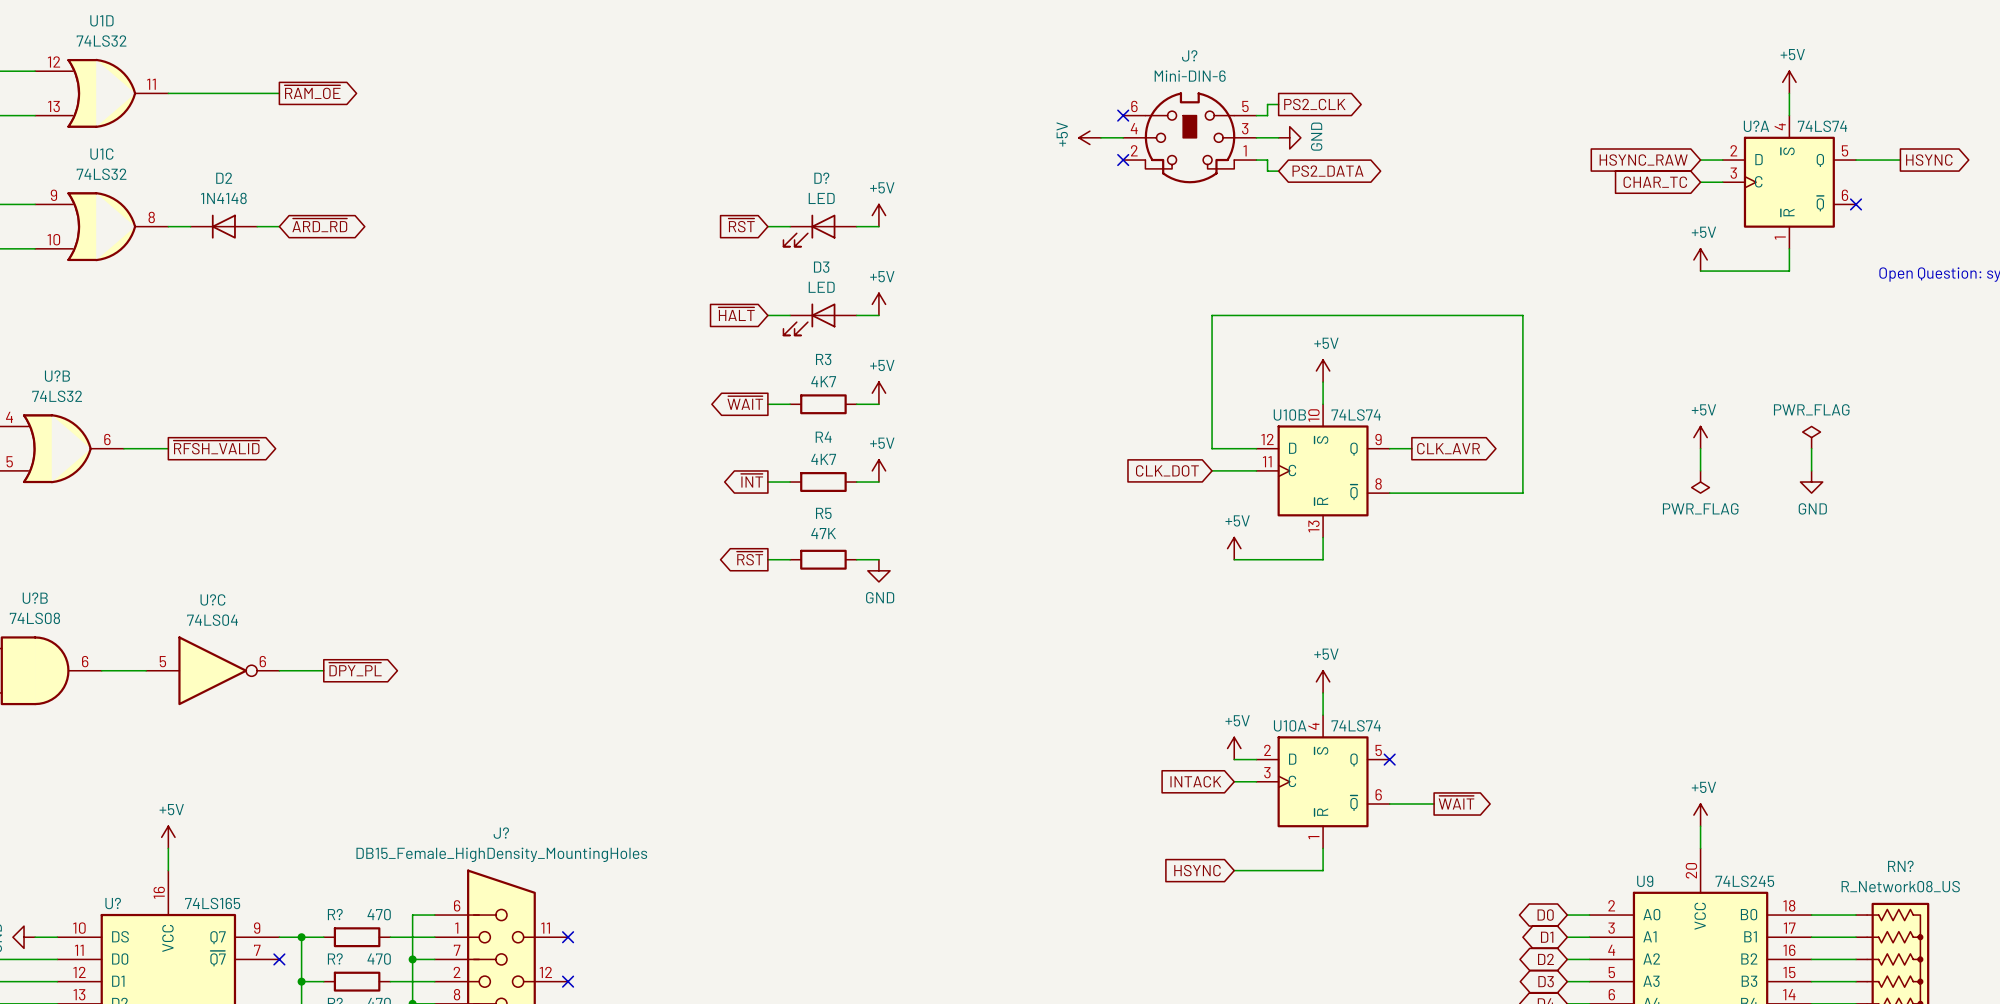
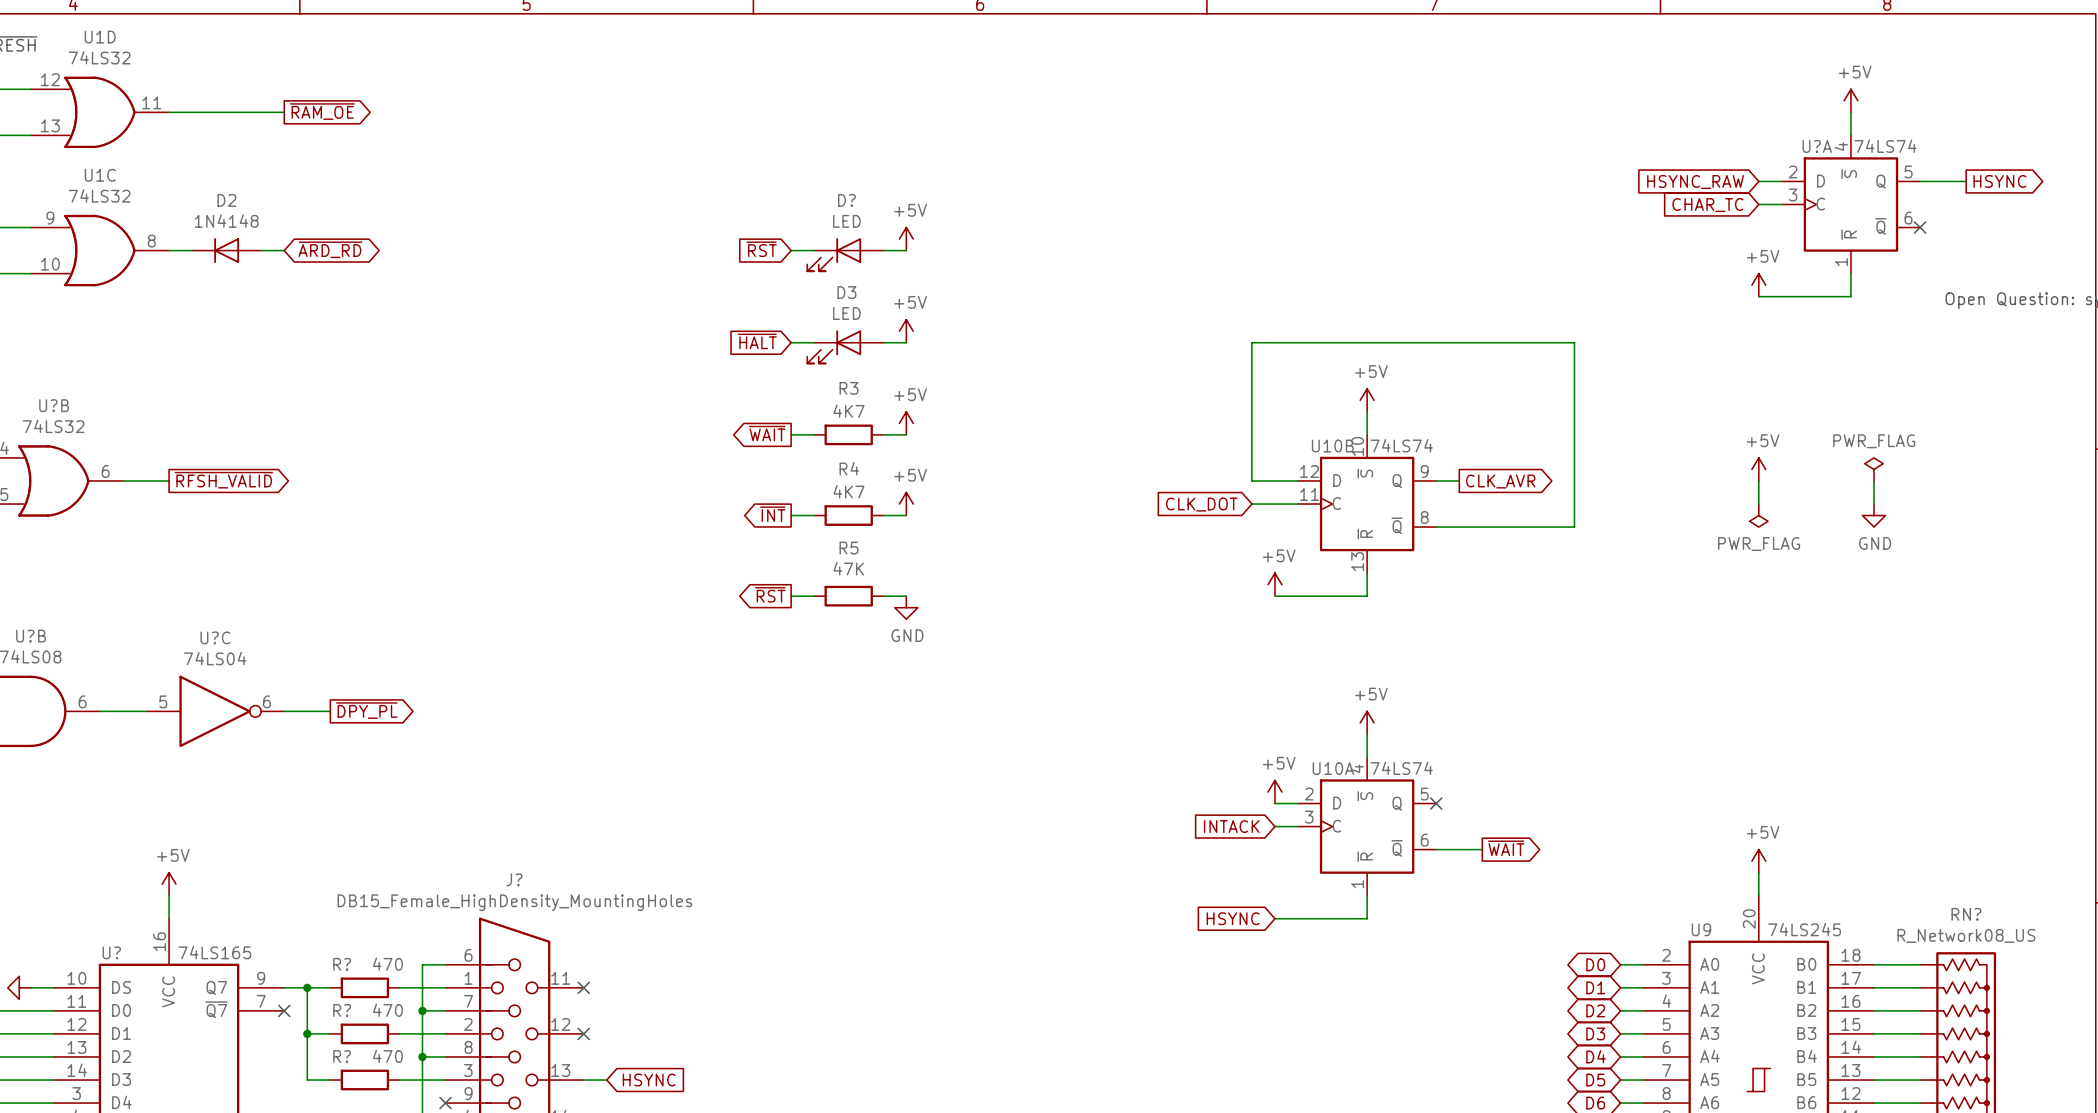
wire: (1278, 104) (1267, 104) (1267, 115) (1256, 115) -> none
global label: PS2_CLK (1314, 104) -> none
no-connect mark: (1123, 115) -> none
power symbol: +5V (1089, 137) -> none
wire: (1101, 137) (1123, 137) -> none
J?: Mini-DIN-6 (1189, 137) -> none
wire: (1256, 137) (1278, 137) -> none
power symbol: GND (1289, 137) -> none
no-connect mark: (1123, 160) -> none
wire: (1256, 160) (1267, 160) (1267, 171) (1278, 171) -> none
global label: PS2_DATA (1328, 171) -> none

